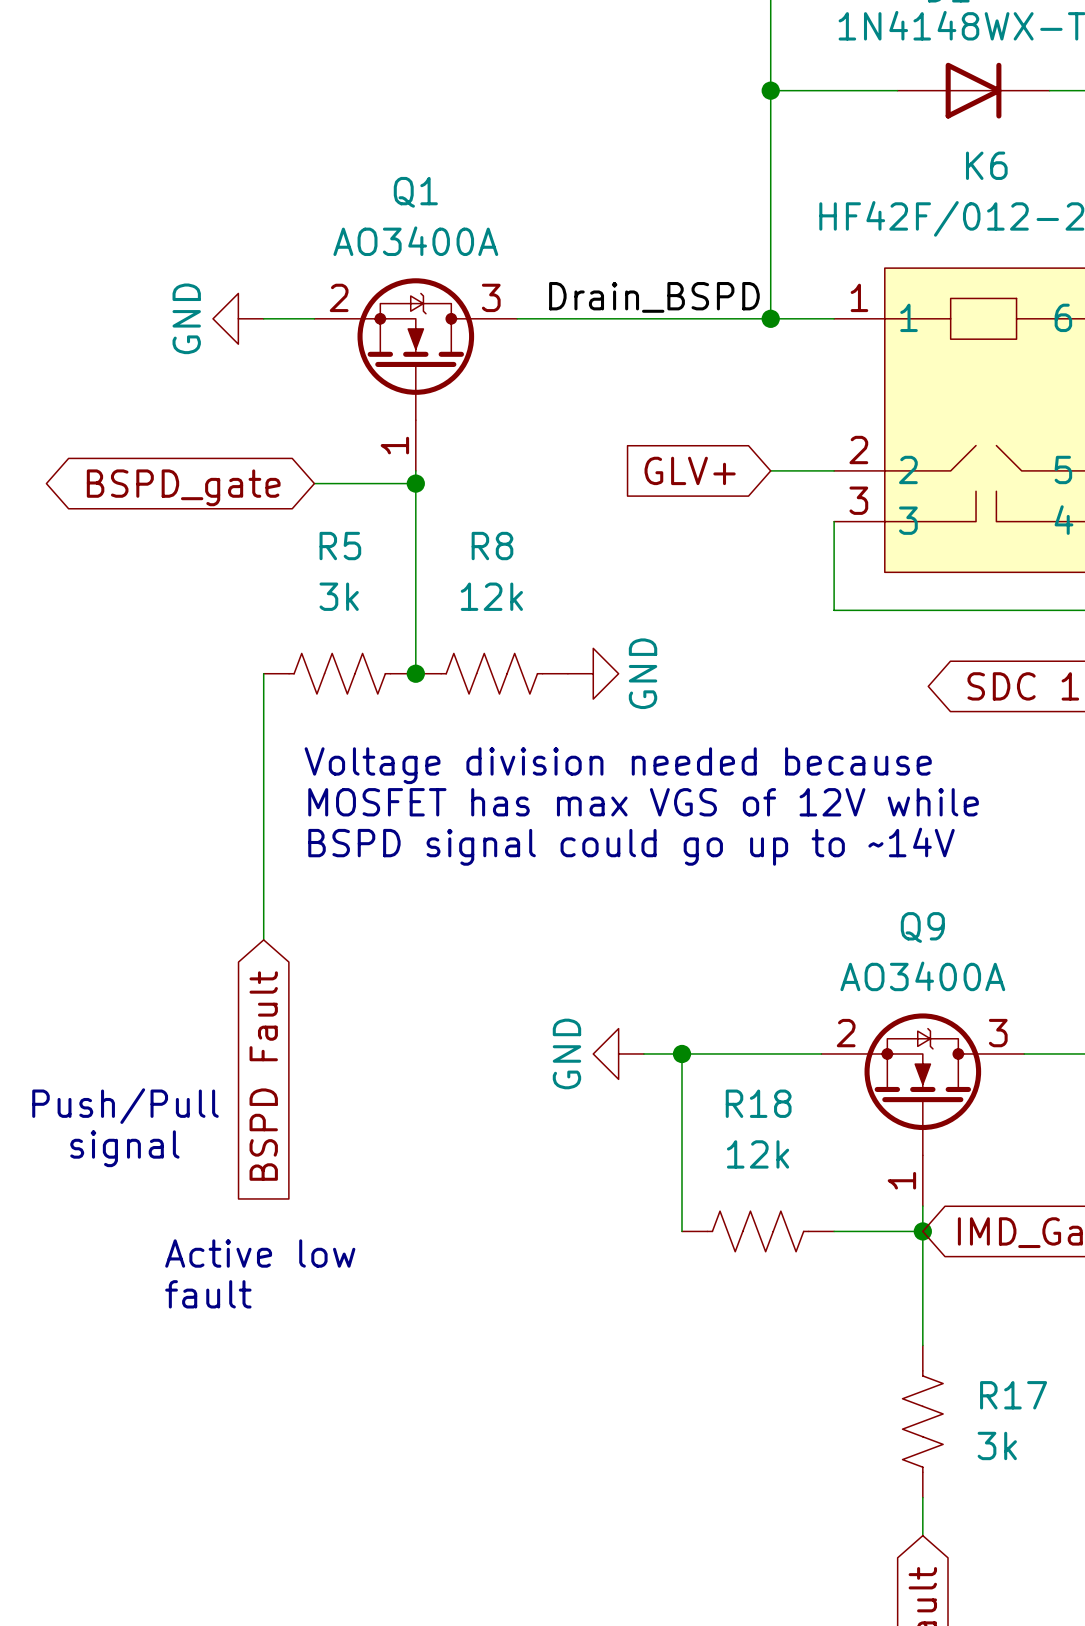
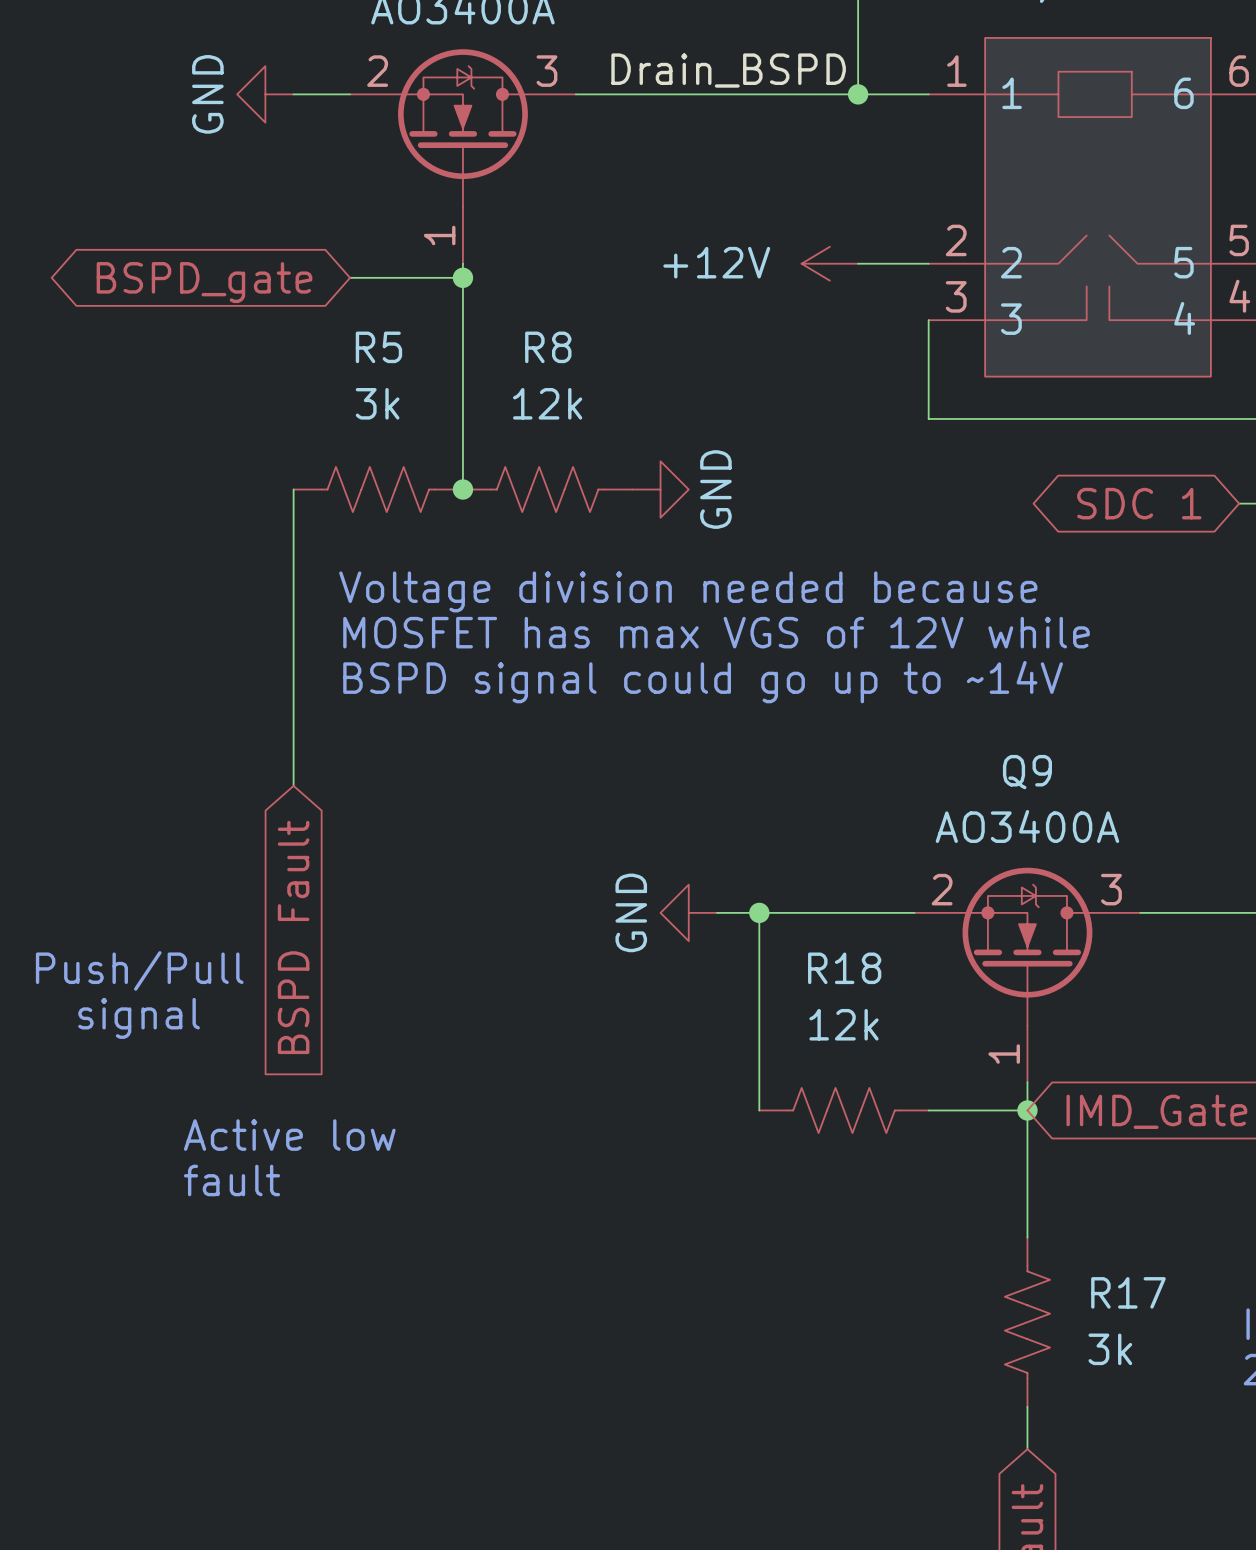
global label: GLV+ (690, 470) -> none
power symbol: none -> +12V (829, 263)

